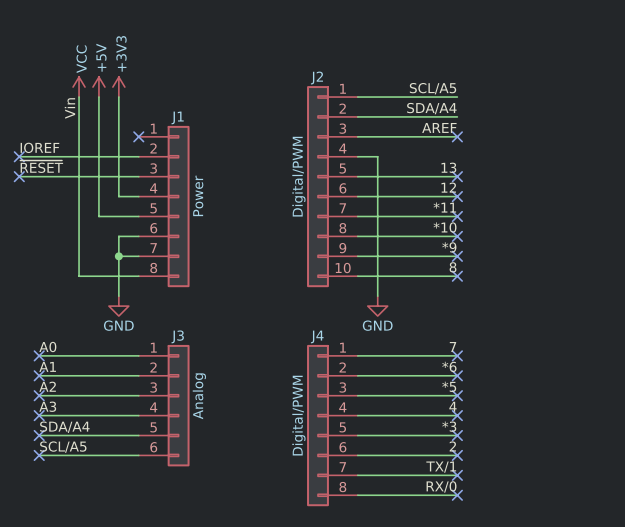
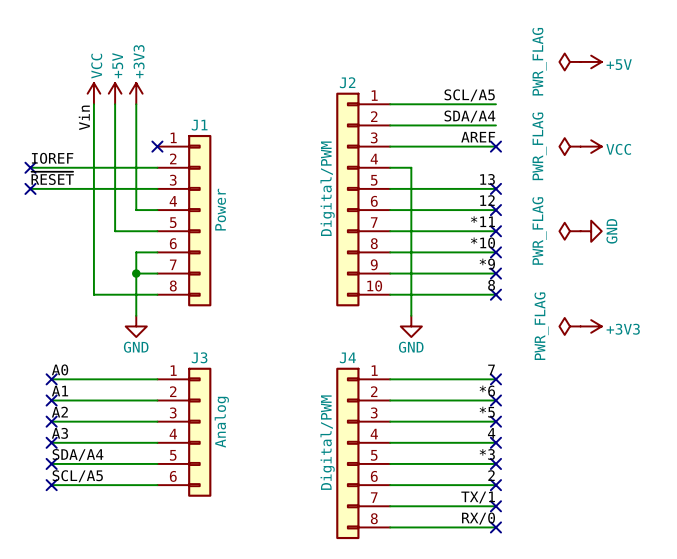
power symbol: none -> PWR_FLAG (570, 61)
power symbol: none -> +5V (591, 61)
power symbol: none -> PWR_FLAG (570, 146)
power symbol: none -> VCC (591, 146)
power symbol: none -> PWR_FLAG (570, 231)
power symbol: none -> GND (591, 231)
power symbol: none -> PWR_FLAG (570, 326)
power symbol: none -> +3V3 (591, 326)

